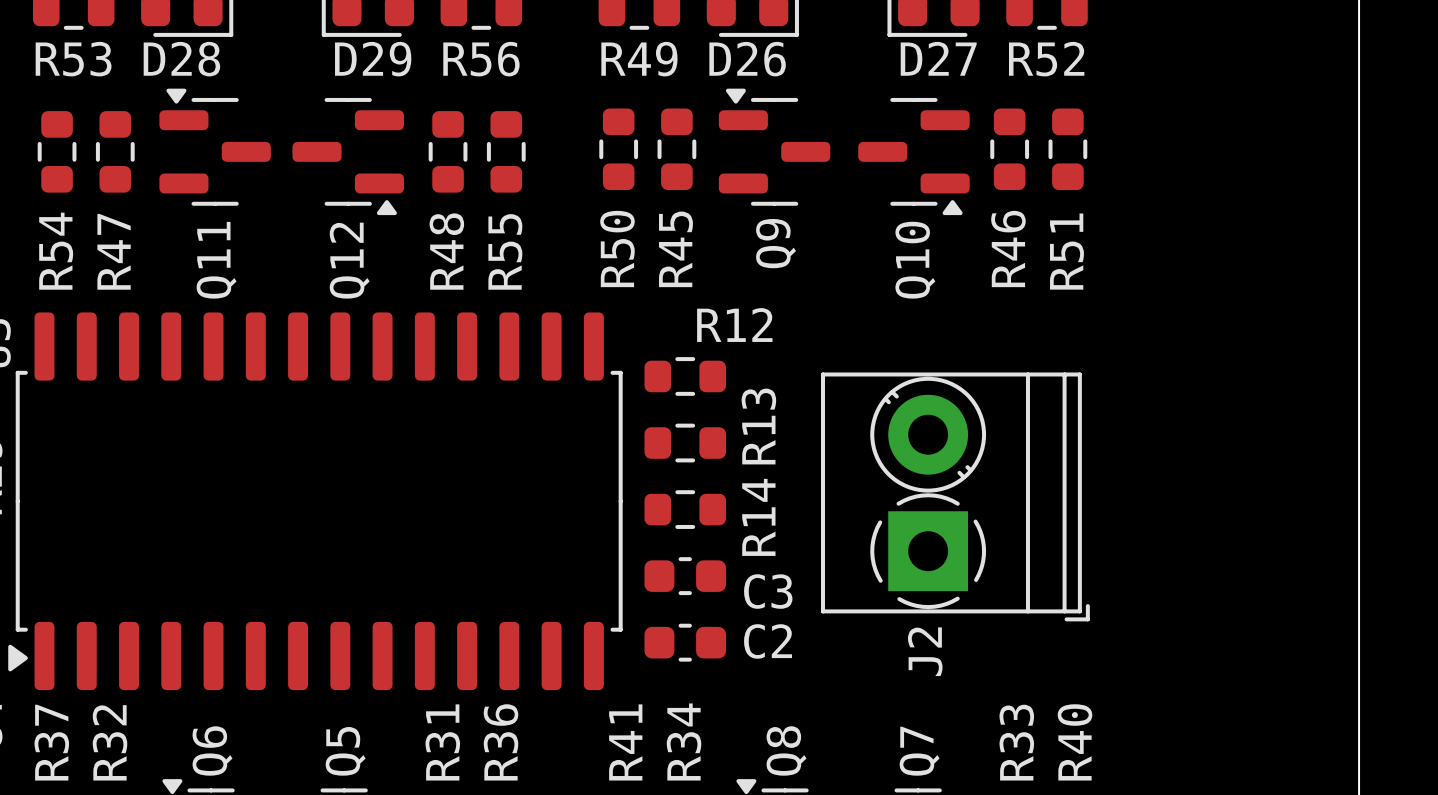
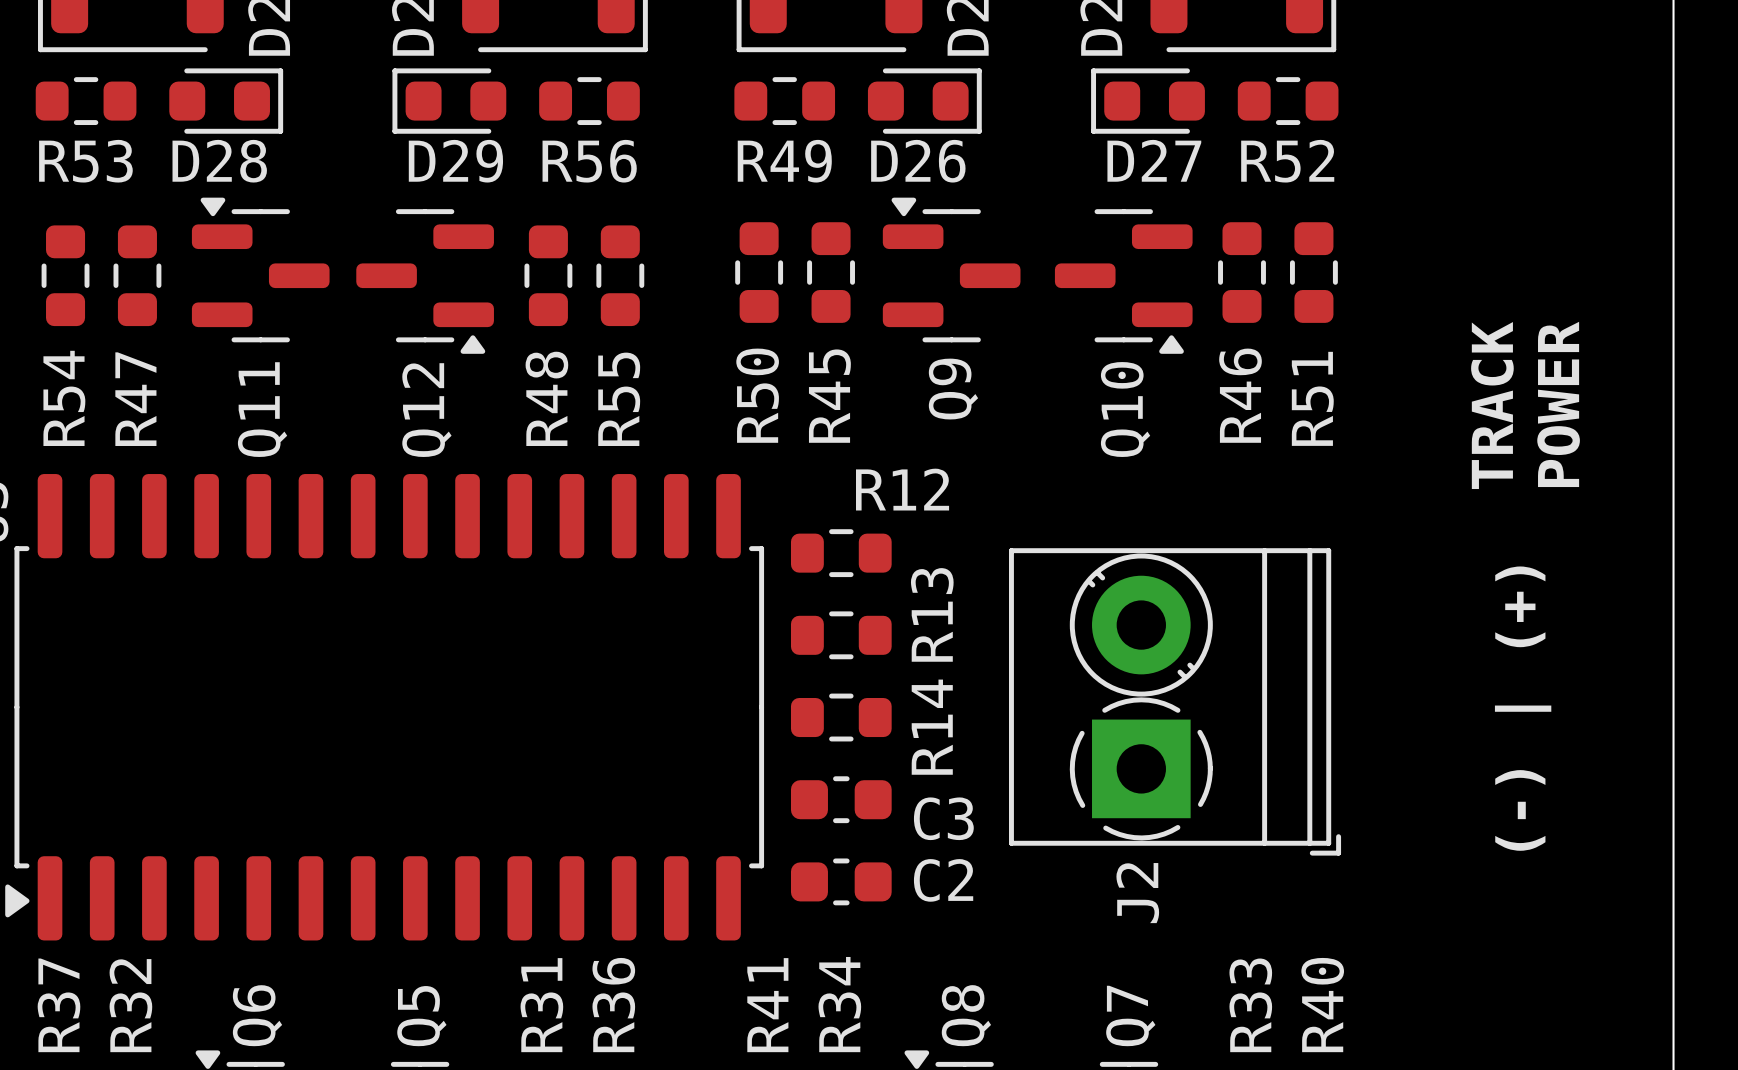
text: none -> TRACK (1492, 405)
text: none -> POWER (1558, 404)
text: none -> (-) | (+) (1523, 708)

